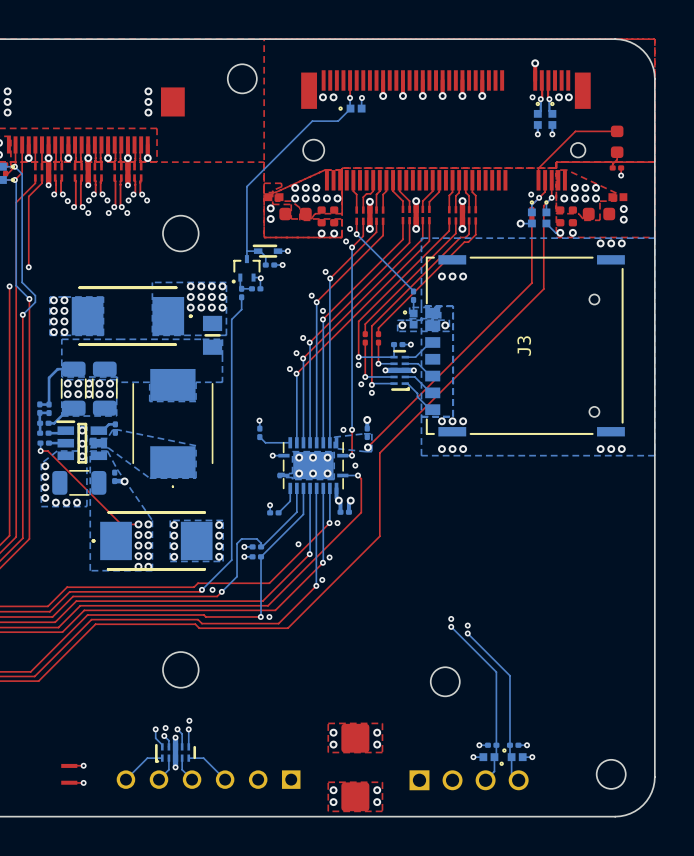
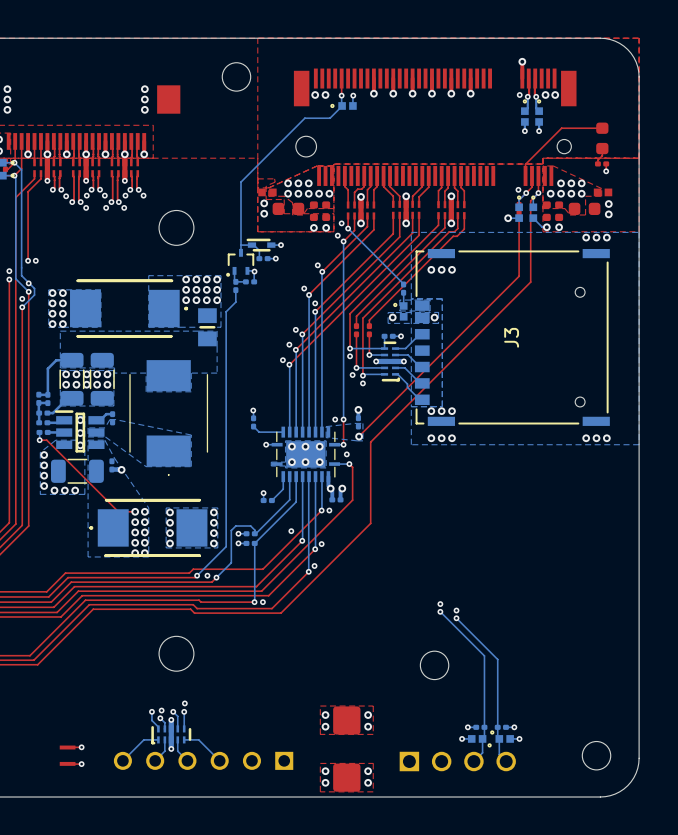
via: none -> (35, 260)
via: none -> (9, 271)
via: none -> (28, 283)
via: none -> (22, 298)

